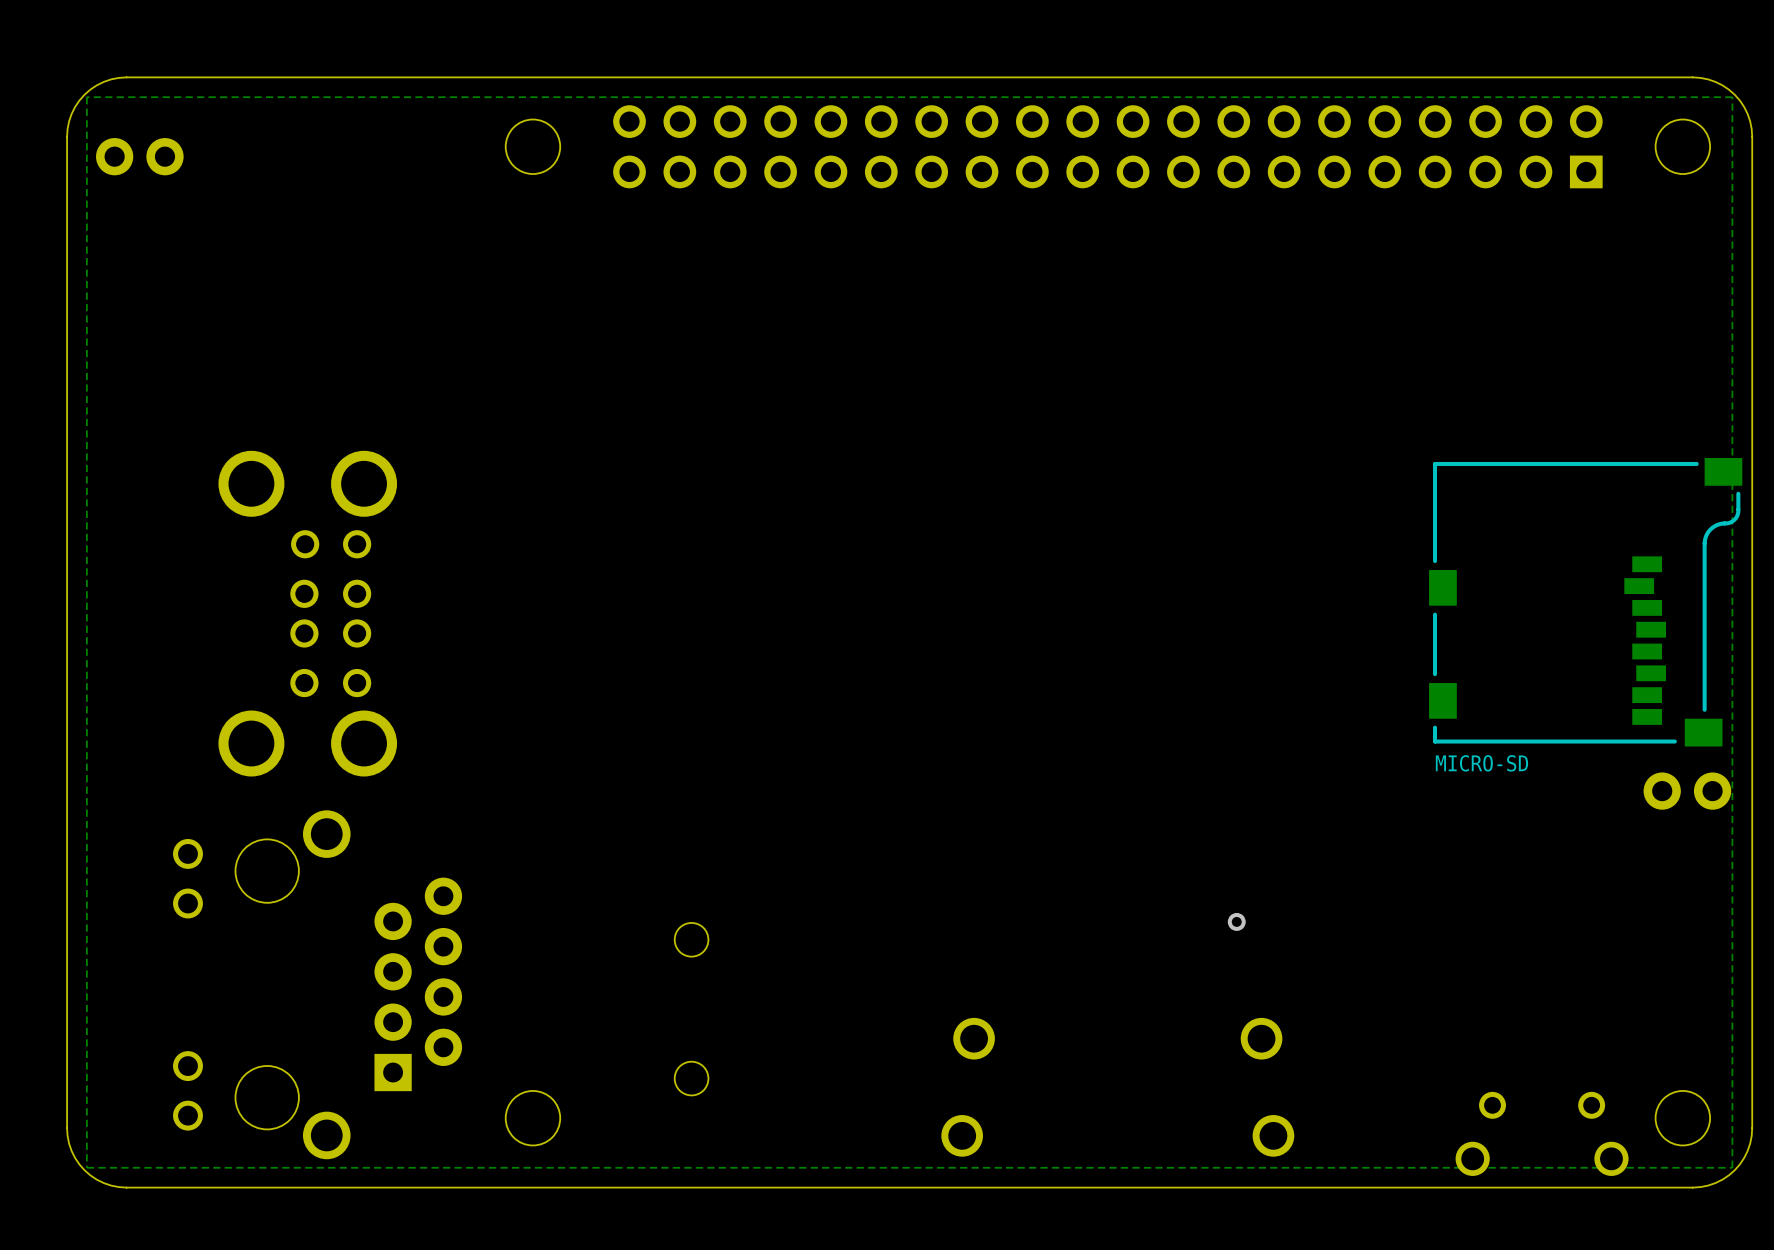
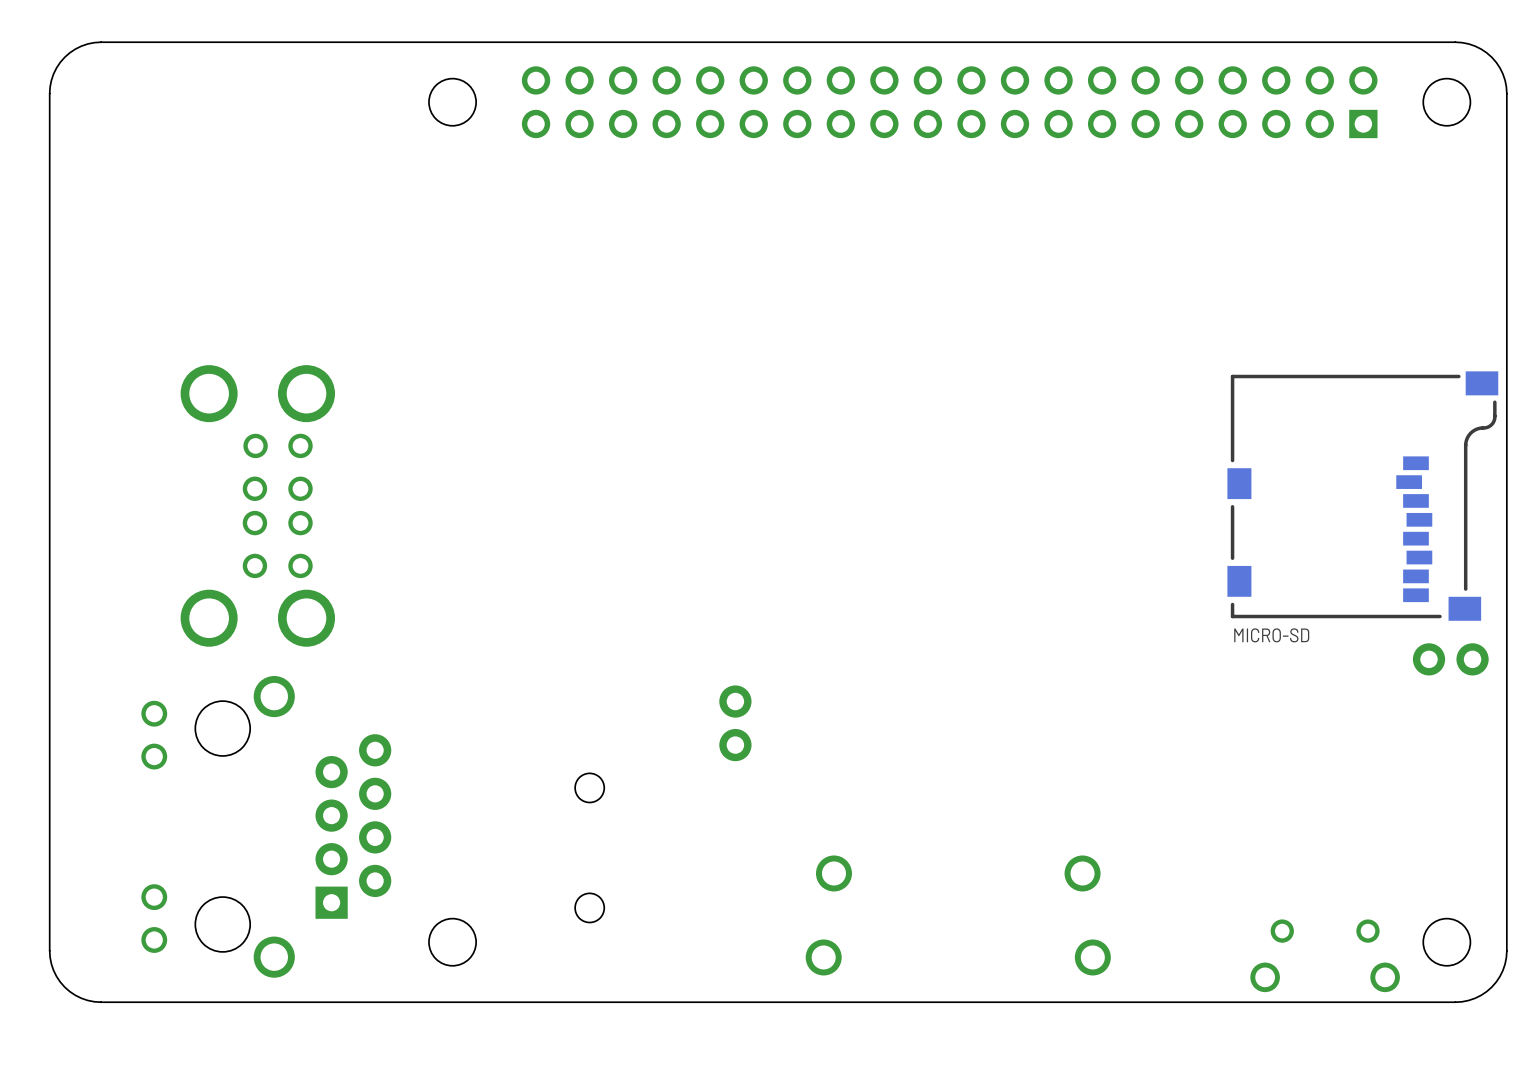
zone outline: (1732, 97) (1732, 1167) (86, 1167) (86, 97) (1732, 97) -> none
part: (139, 156) -> none
part: none -> (735, 723)
via: (1236, 921) -> none

